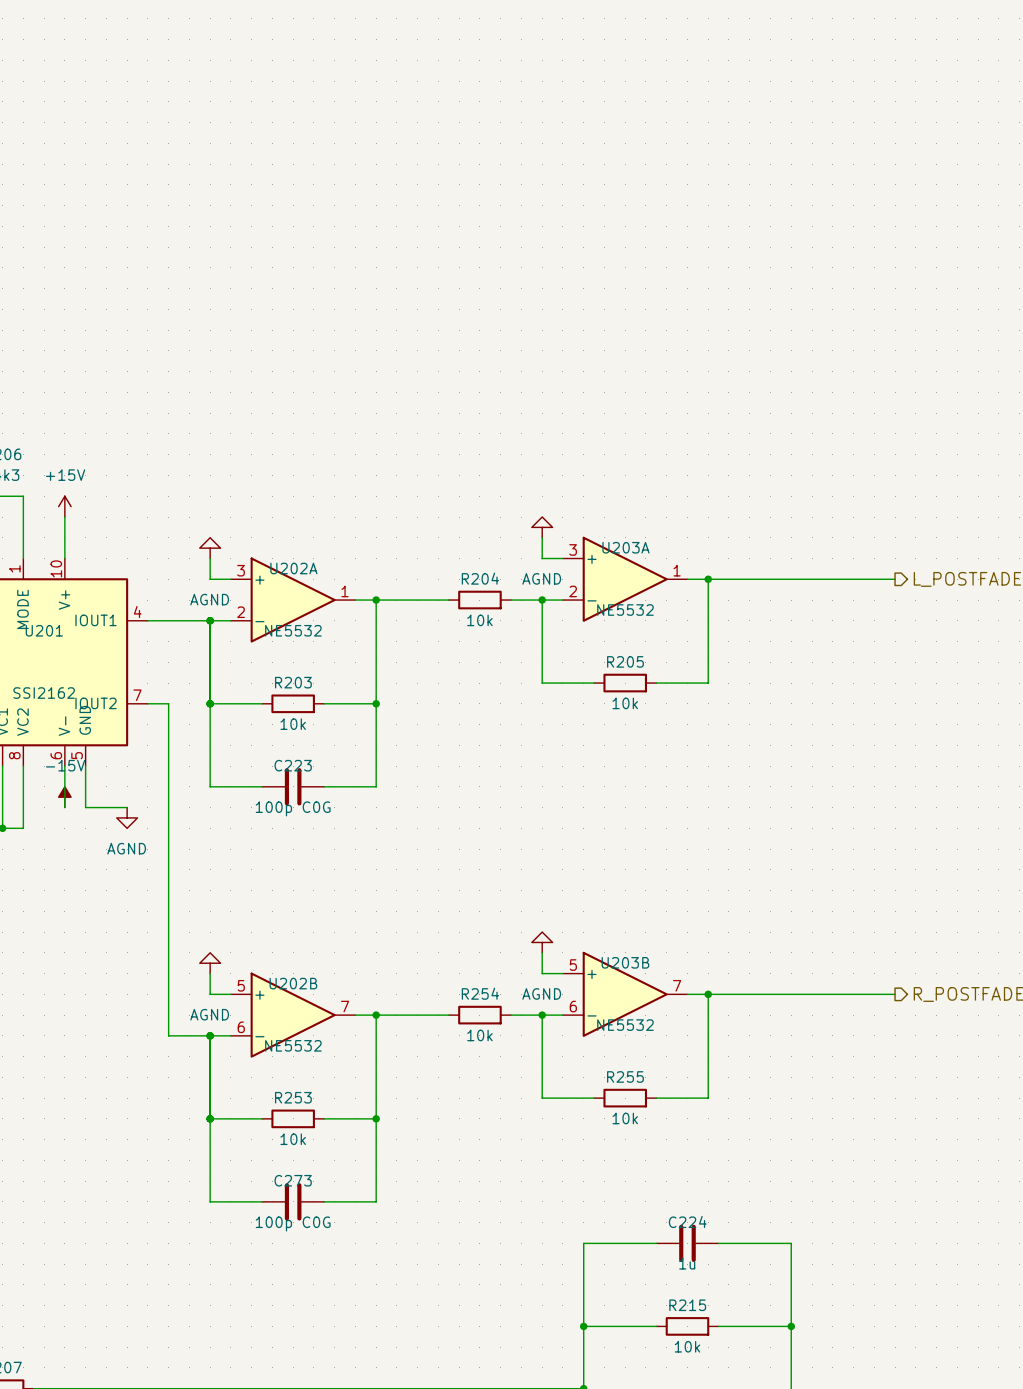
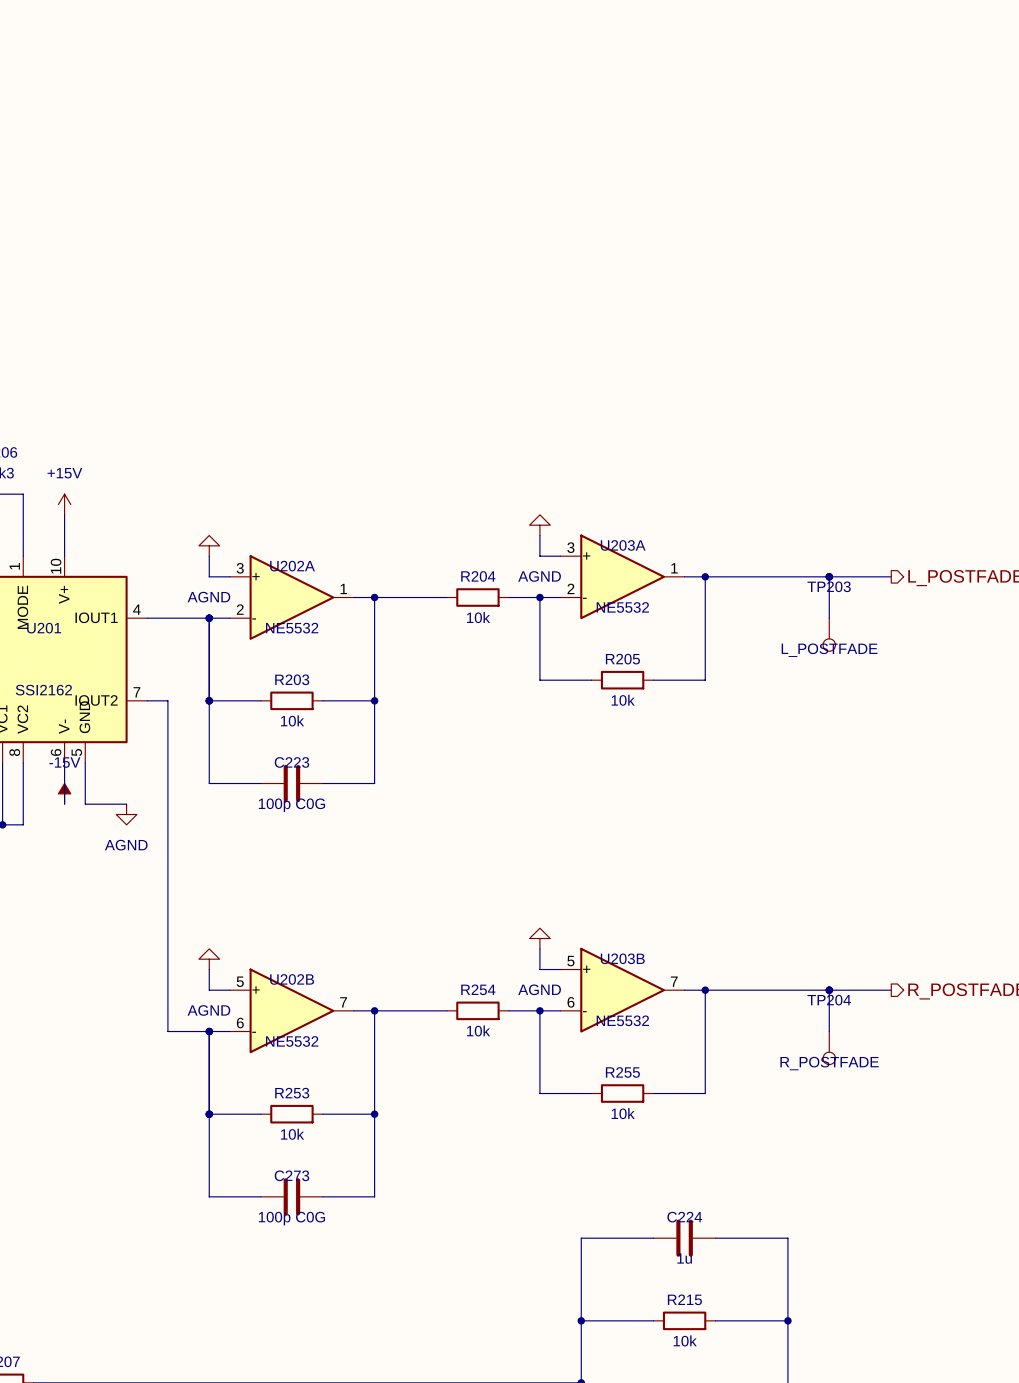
wire: none -> (829, 576) (829, 618)
junction: none -> (829, 576)
TP203: none -> L_POSTFADE (829, 634)
wire: none -> (829, 990) (829, 1031)
junction: none -> (829, 990)
TP204: none -> R_POSTFADE (829, 1048)

